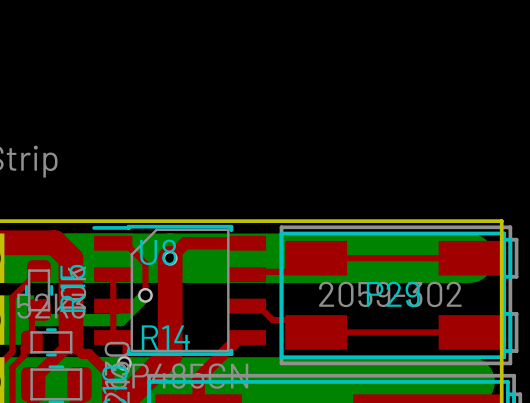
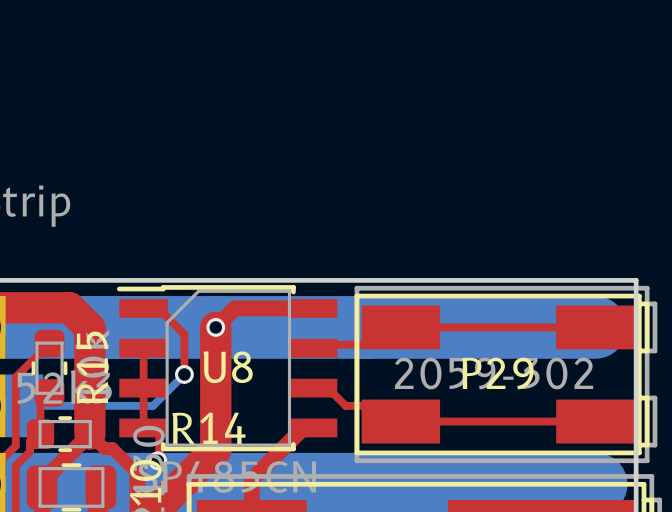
U8 name position: U8 (158, 252) -> U8 (228, 367)
bottom track width: thick (145, 295) (120, 320) (19, 320) -> thin (184, 374) (153, 405) (24, 405)

